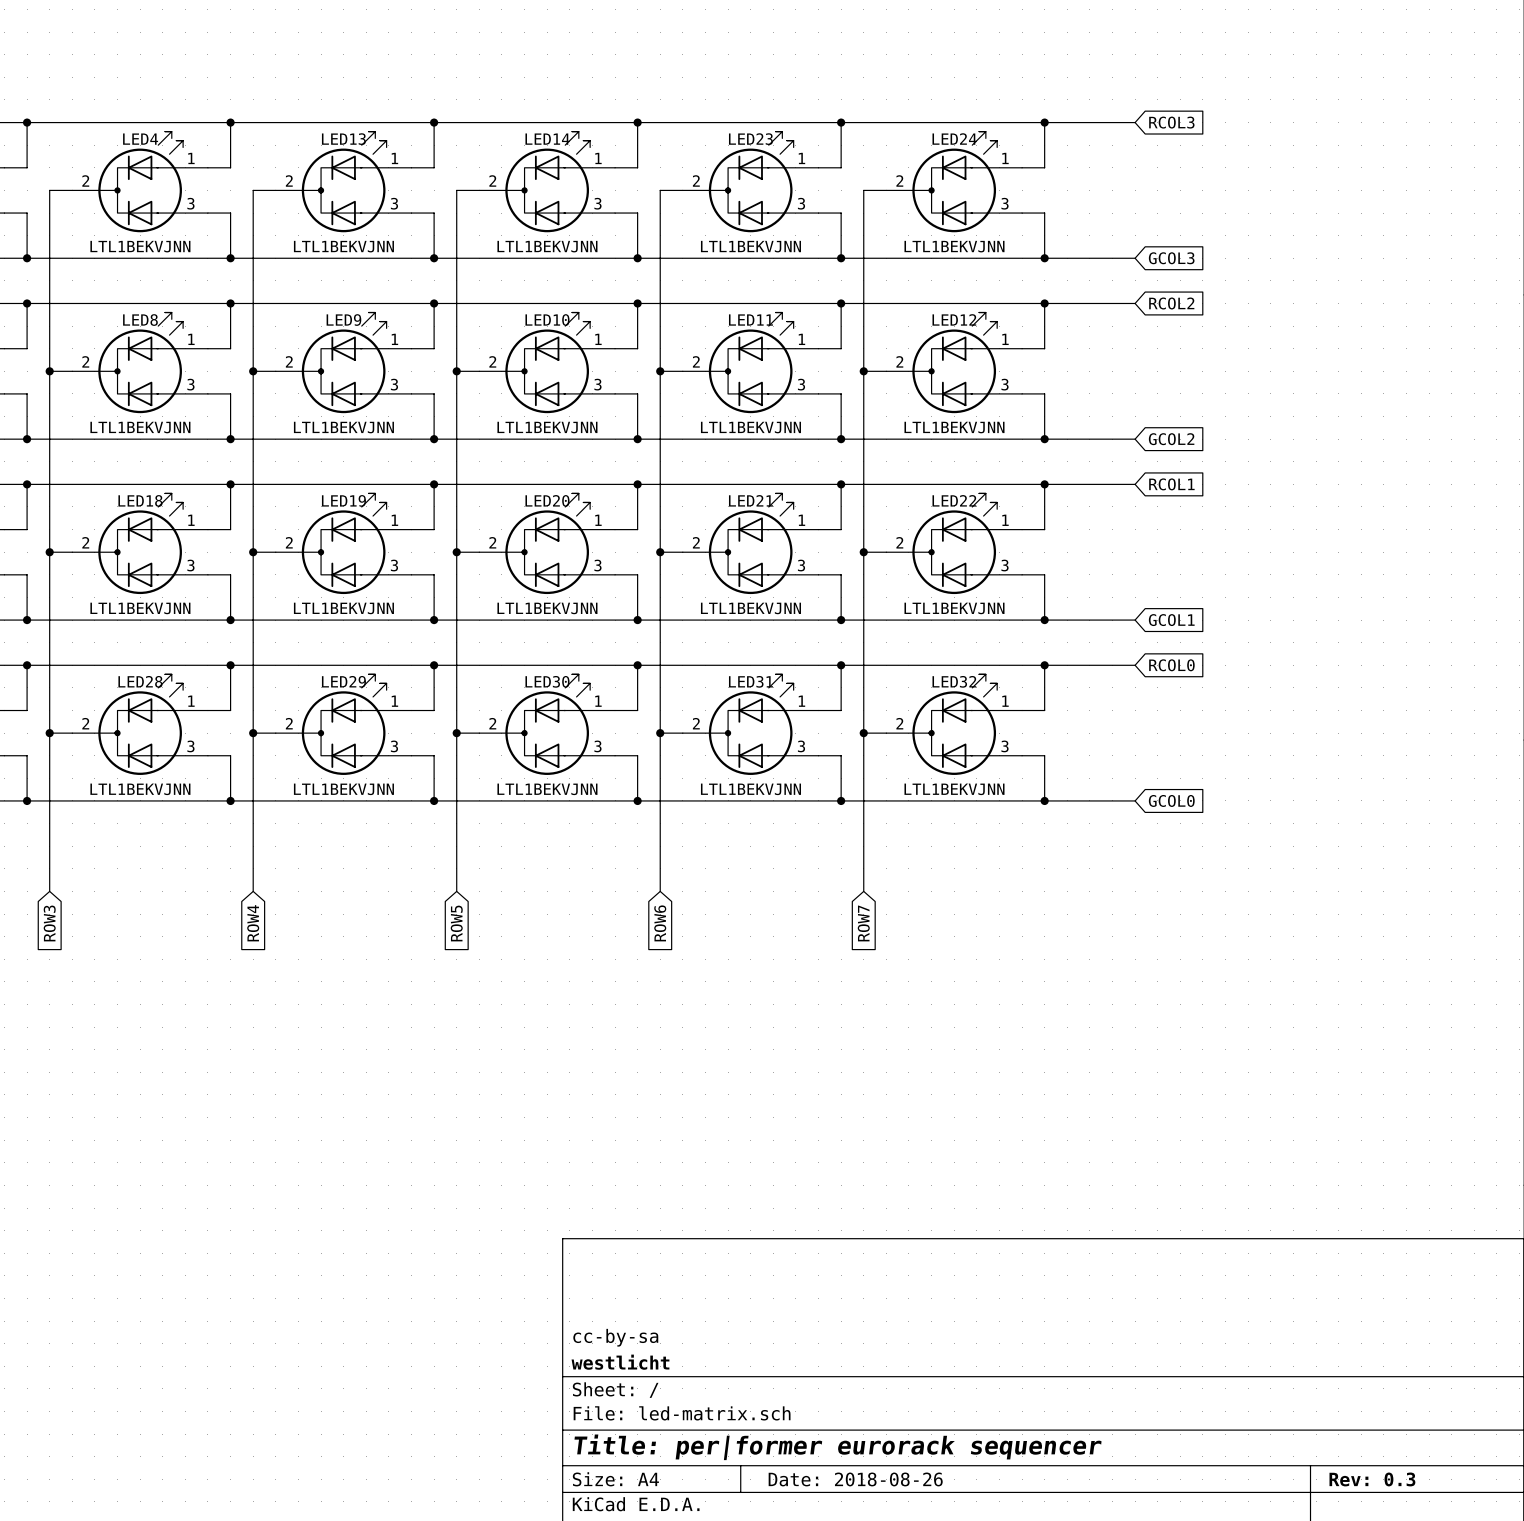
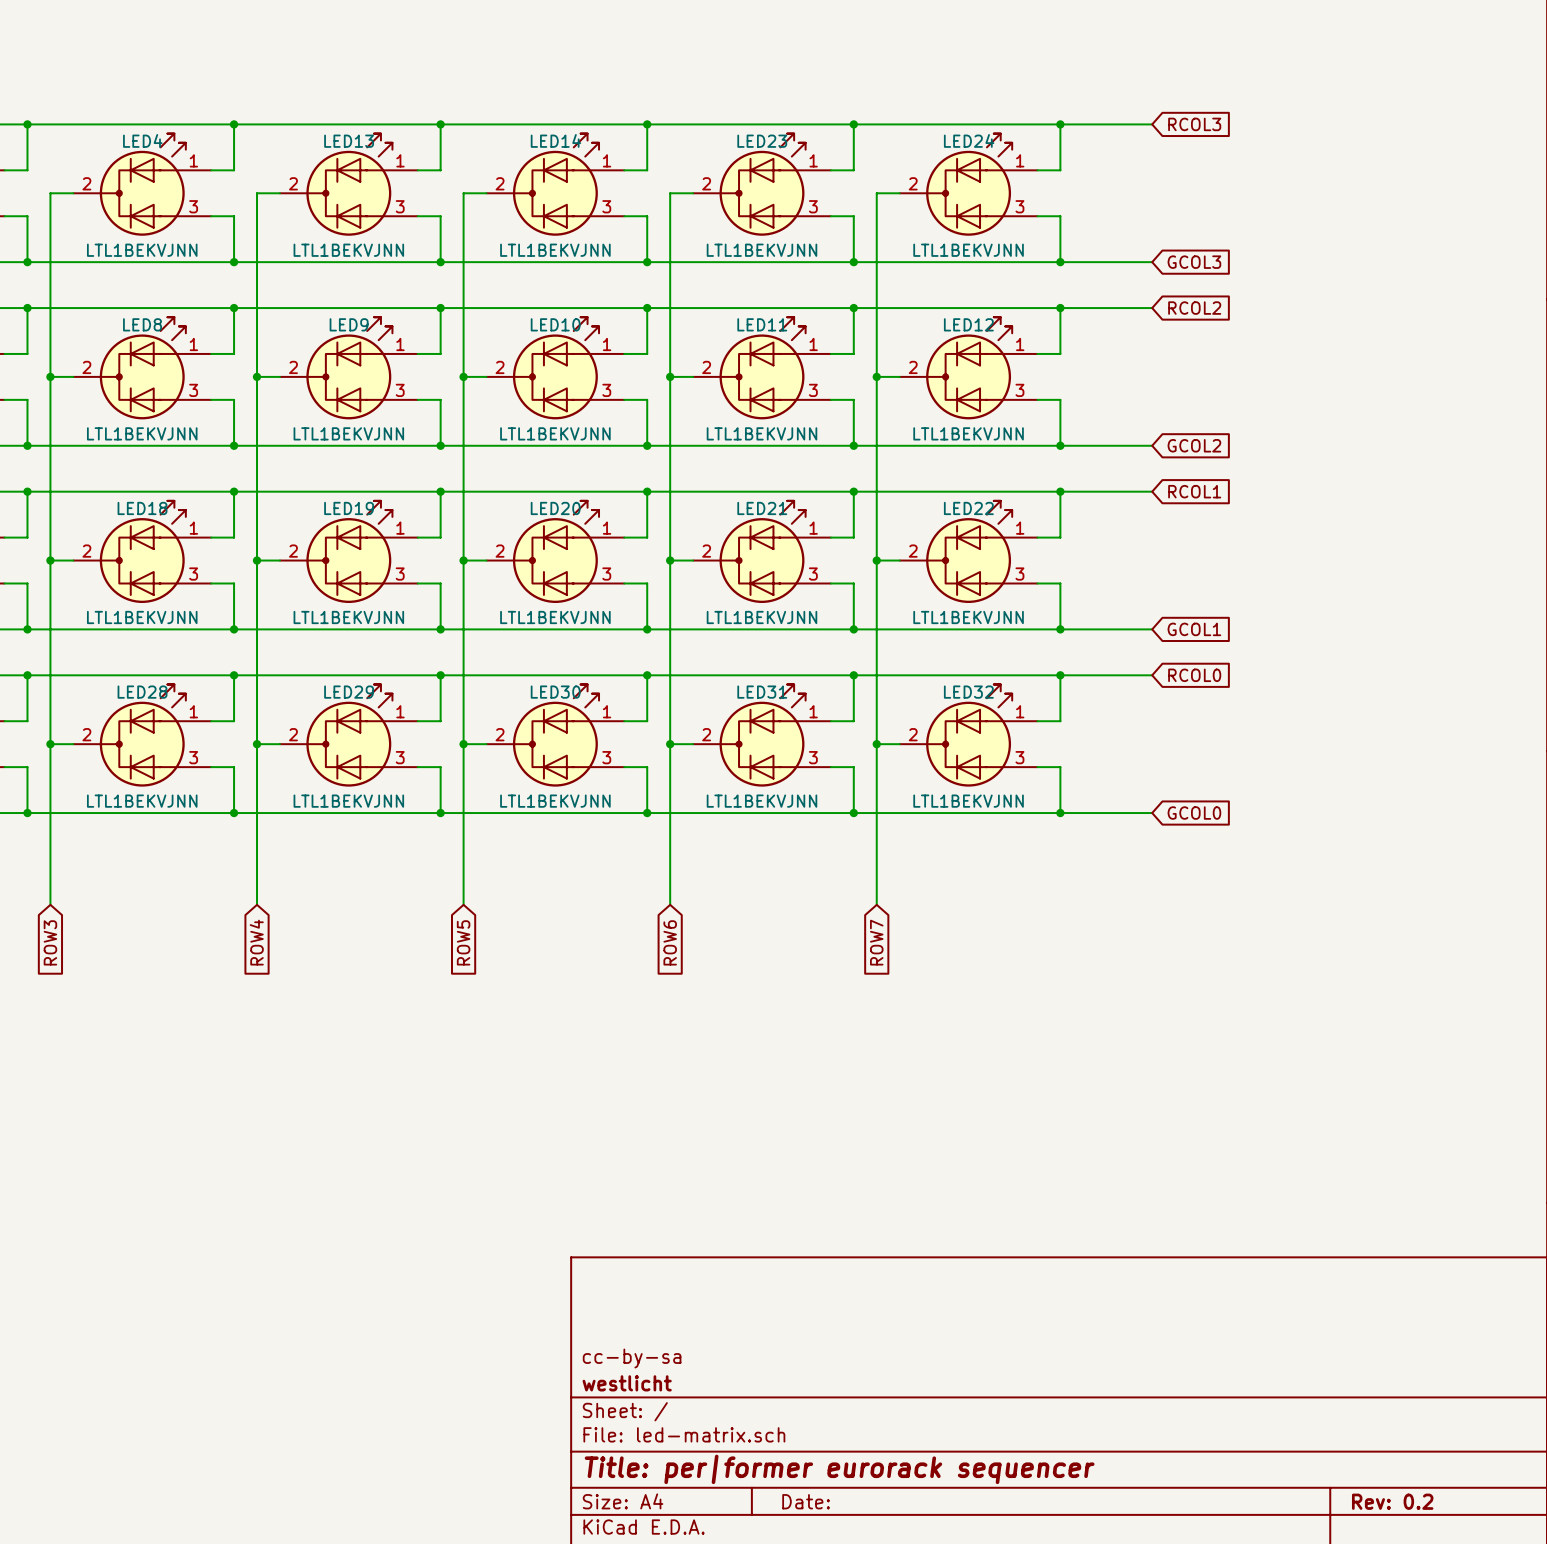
title block: Date: 2018-08-26 (855, 1479) -> Date: (806, 1501)
title block: Rev: 0.3 (1372, 1479) -> Rev: 0.2 (1392, 1501)

